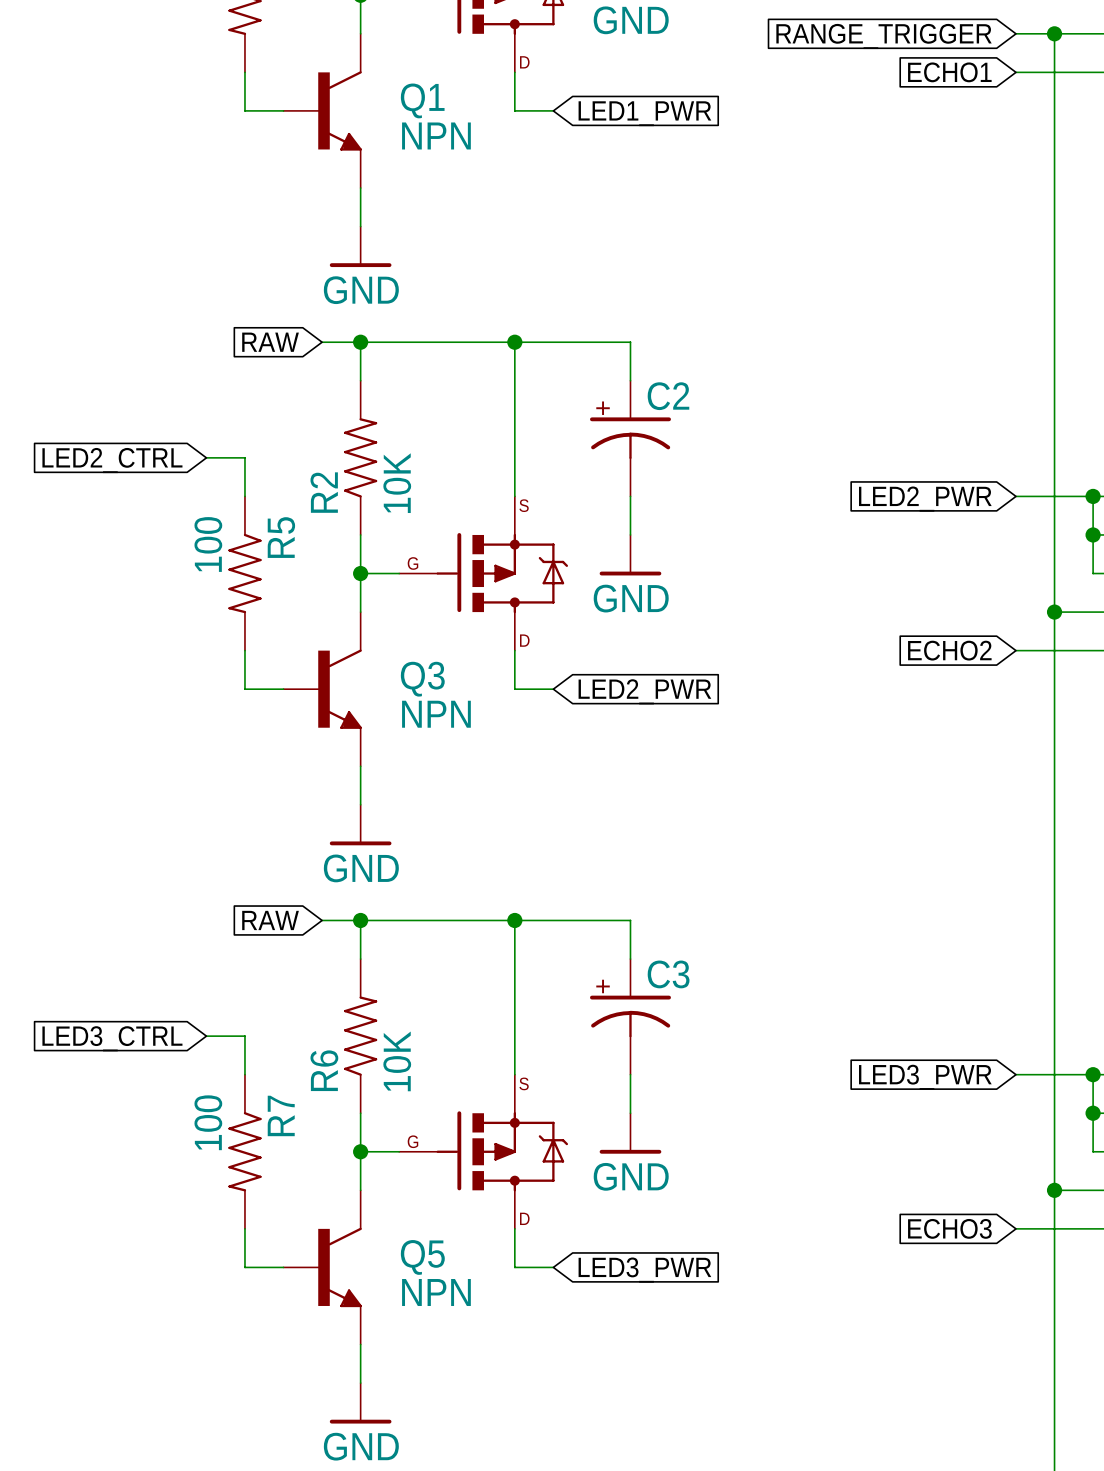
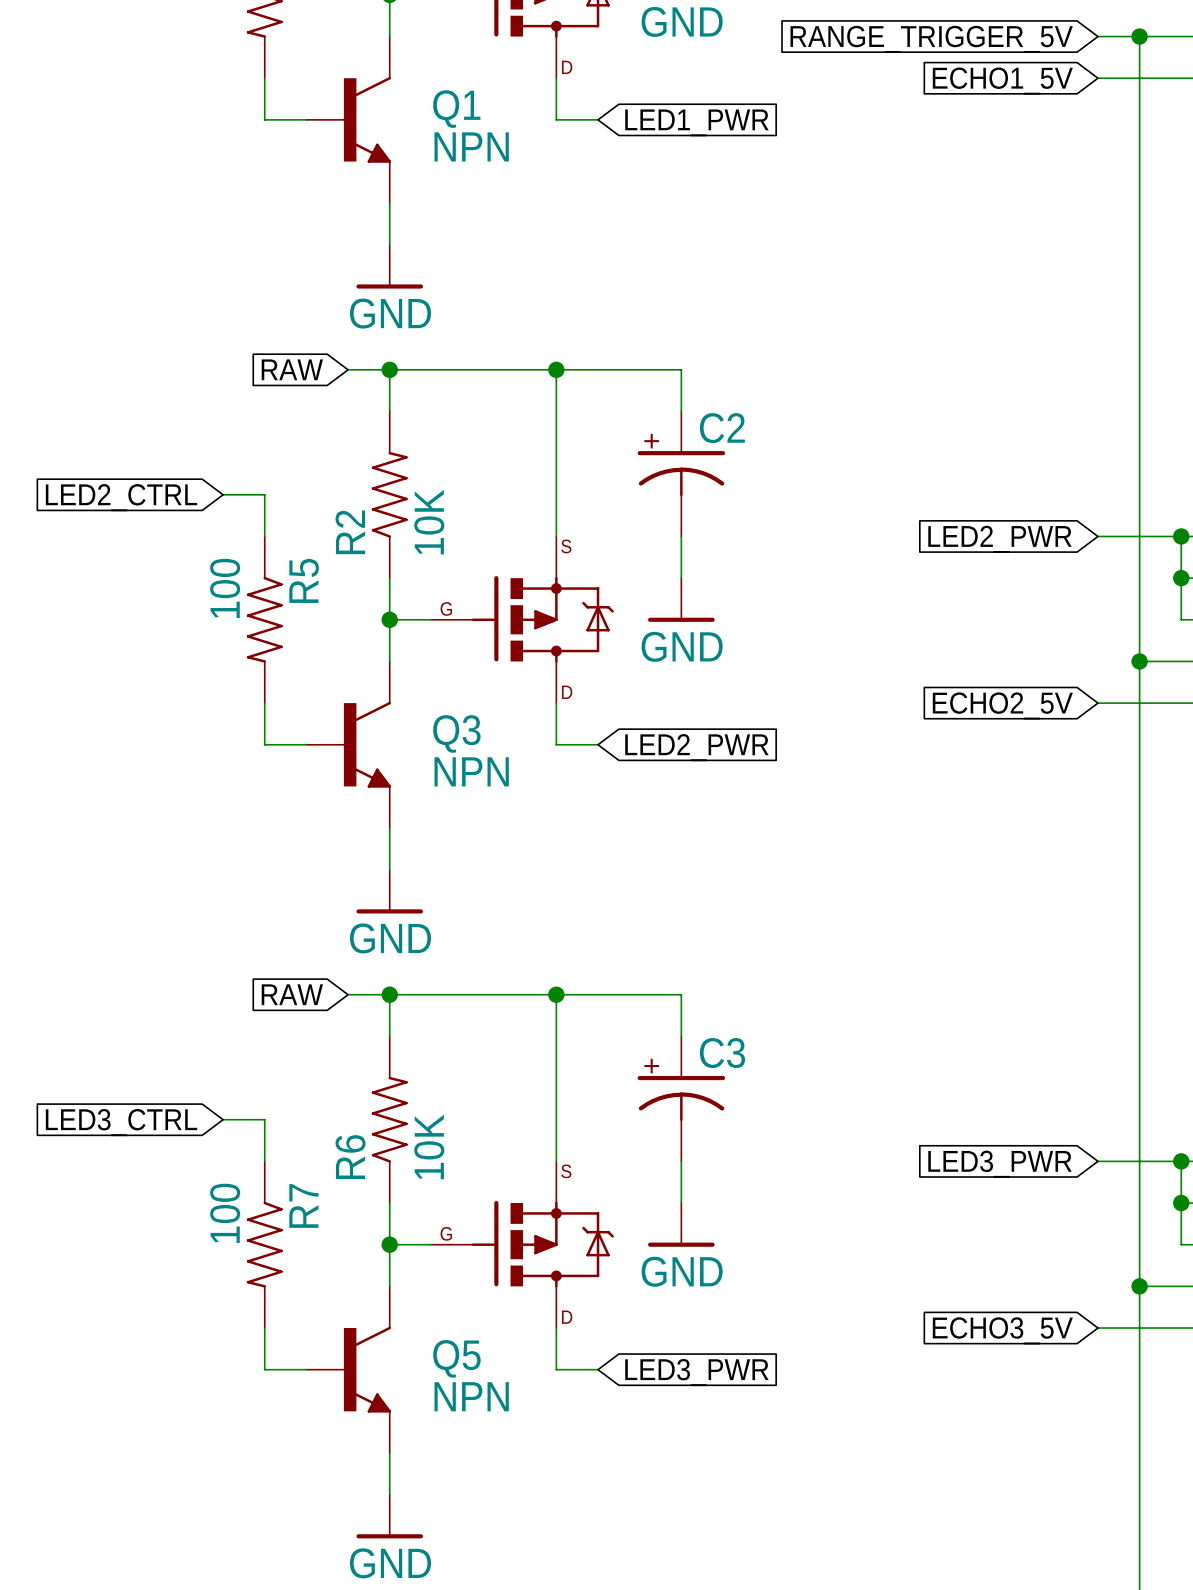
global label: RANGE_TRIGGER (884, 36) -> RANGE_TRIGGER_5V (931, 39)
global label: ECHO1 (949, 72) -> ECHO1_5V (1002, 81)
global label: ECHO2 (949, 650) -> ECHO2_5V (1002, 705)
global label: ECHO3 (949, 1228) -> ECHO3_5V (1002, 1330)

